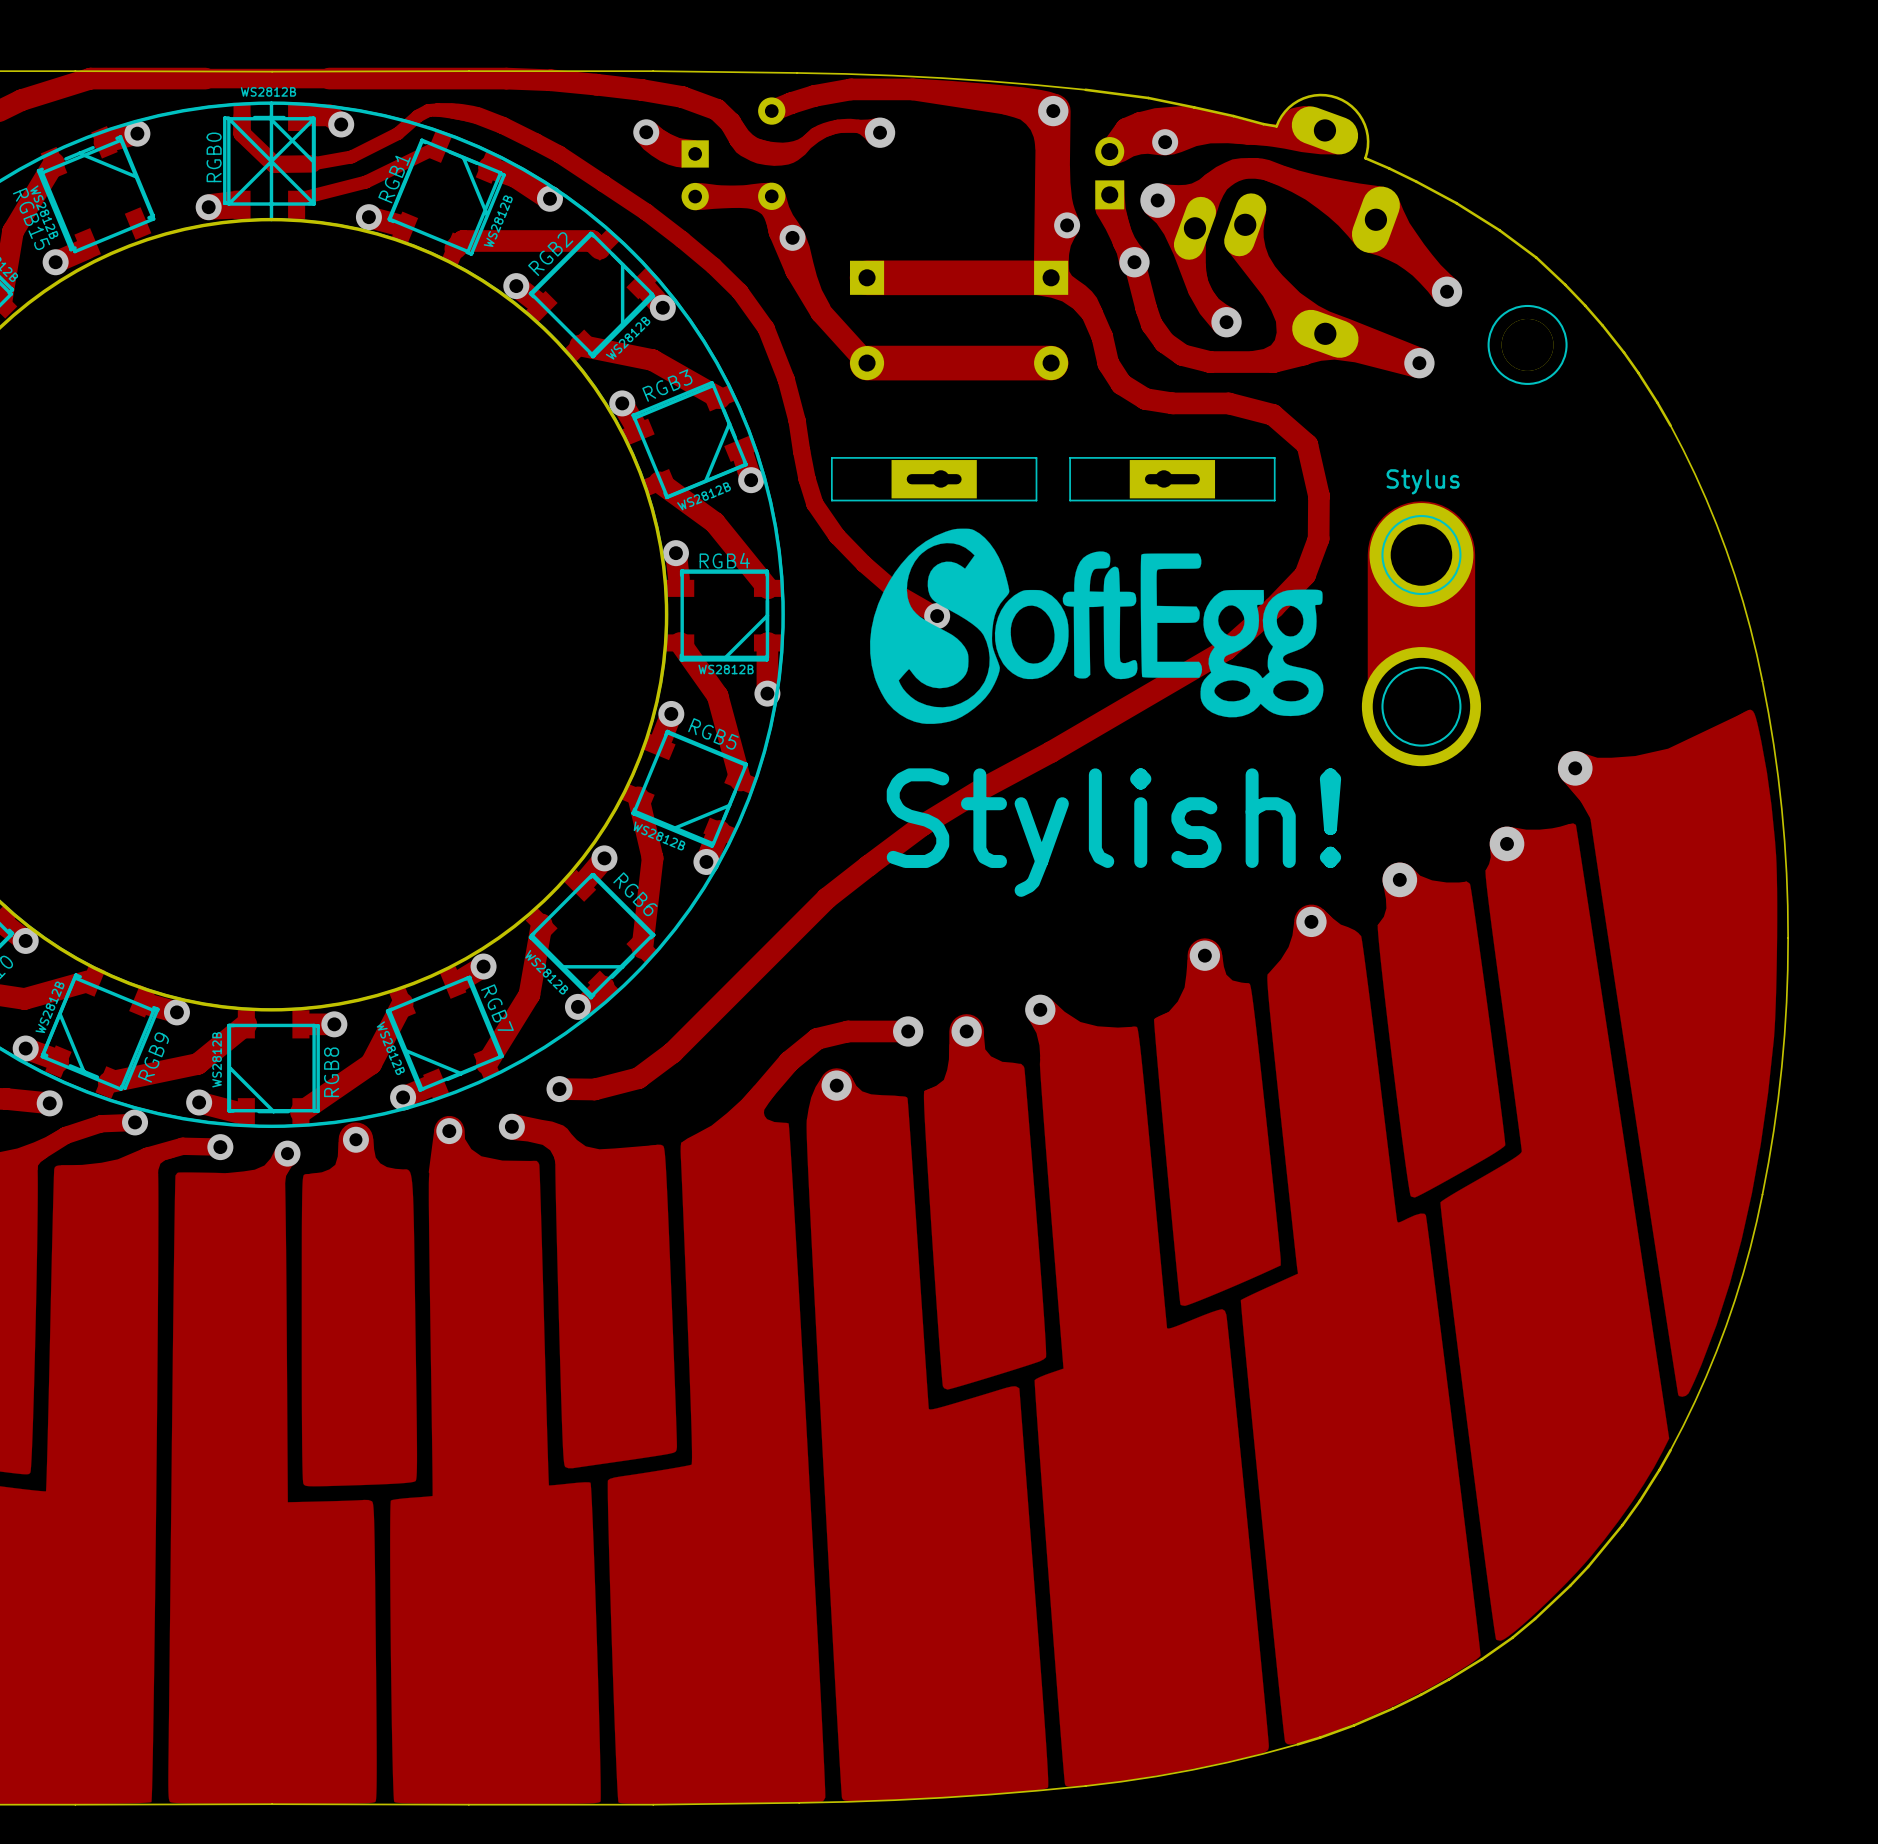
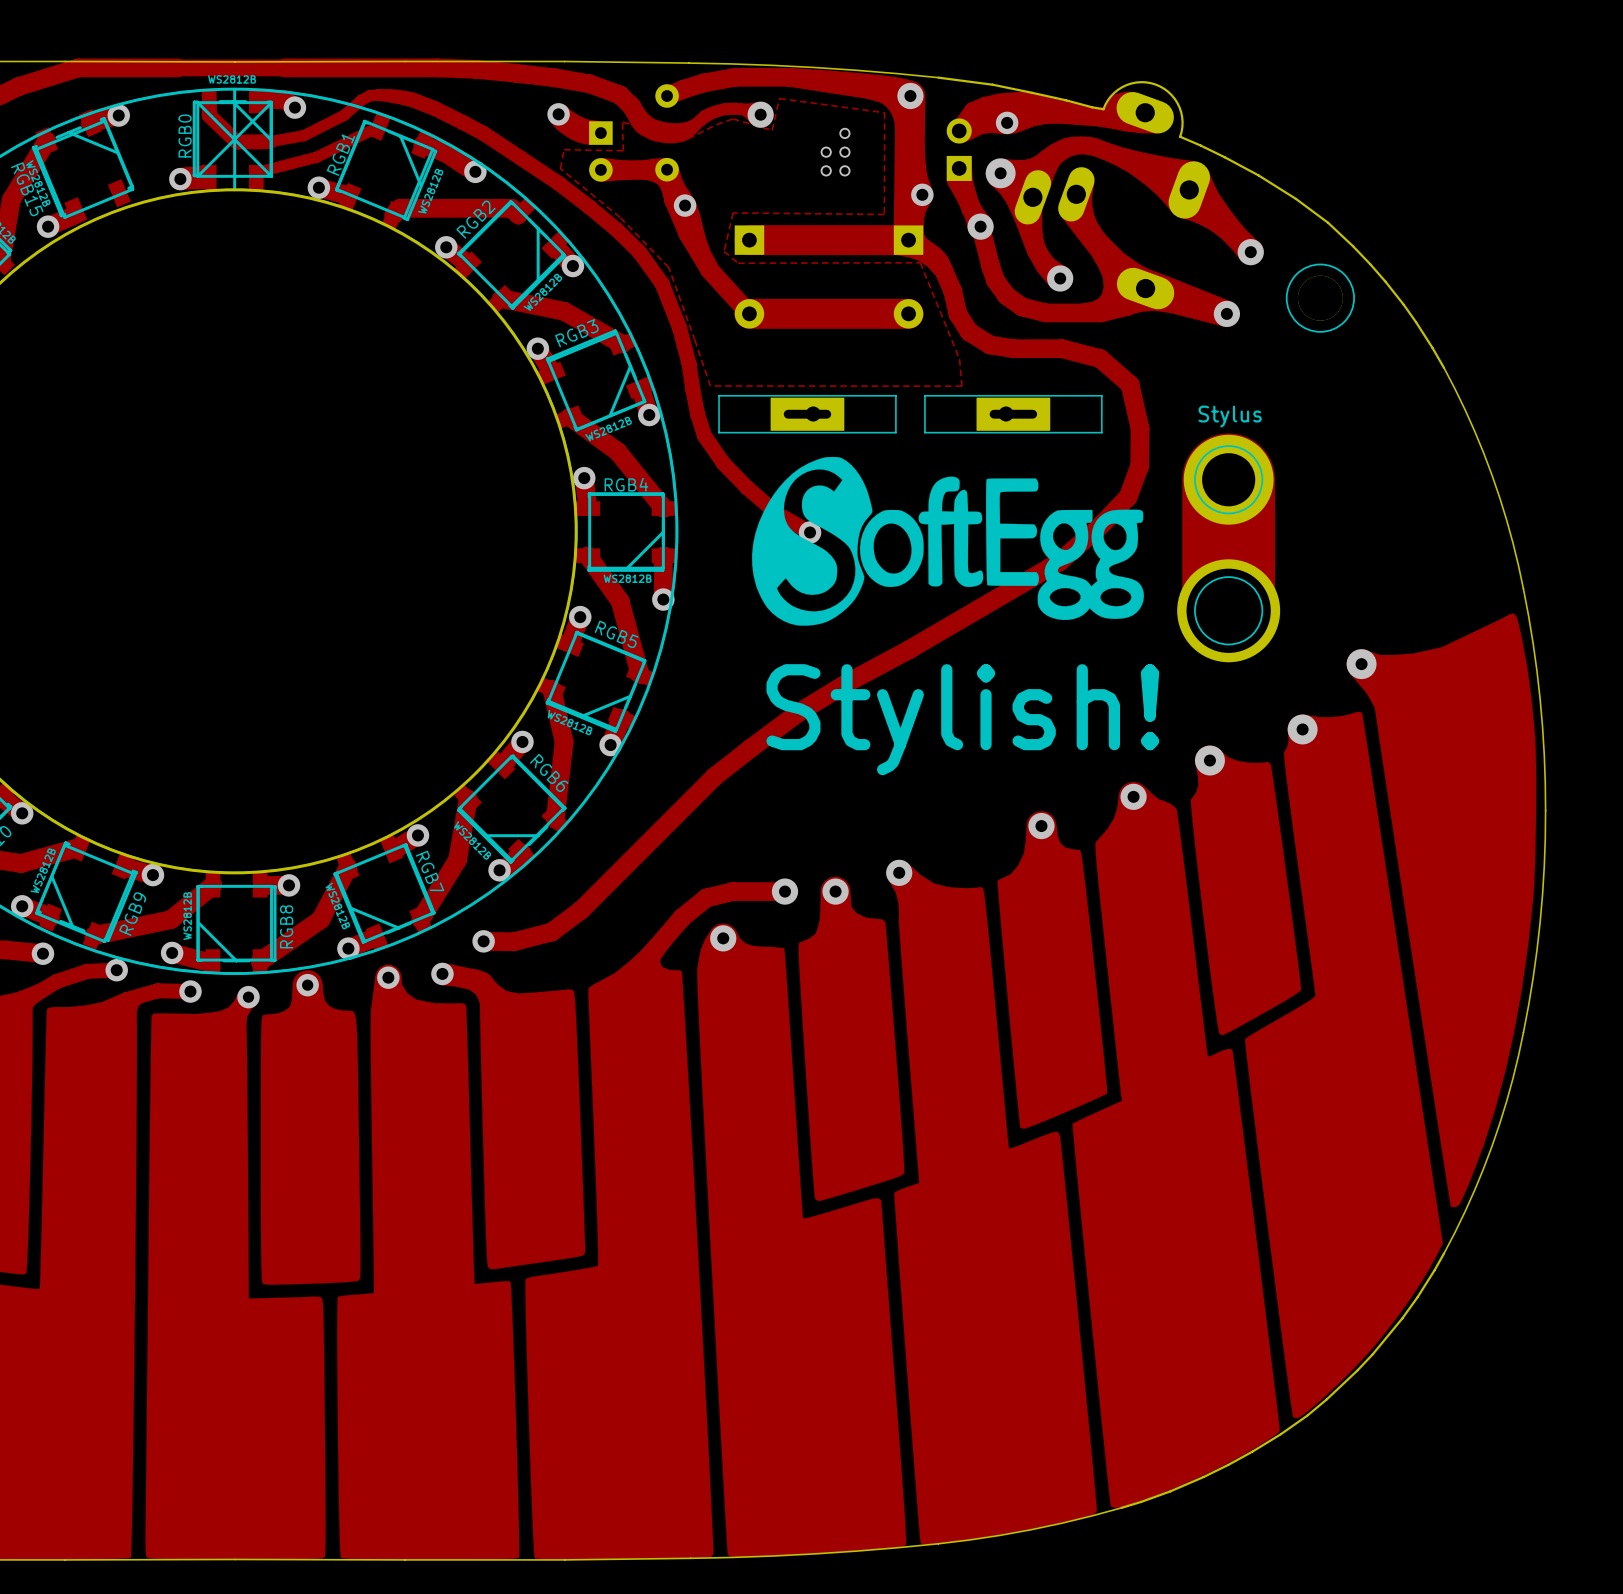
zone outline: none -> (779, 98) (884, 112) (884, 214) (733, 212) (724, 251) (738, 263) (920, 262) (959, 359) (962, 386) (710, 386) (668, 267) (620, 217) (560, 168) (564, 149) (623, 150) (622, 122) (688, 138) (732, 118) (772, 130) (779, 98)
via: none -> (844, 133)
via: none -> (826, 152)
via: none -> (844, 152)
via: none -> (826, 170)
via: none -> (844, 170)

